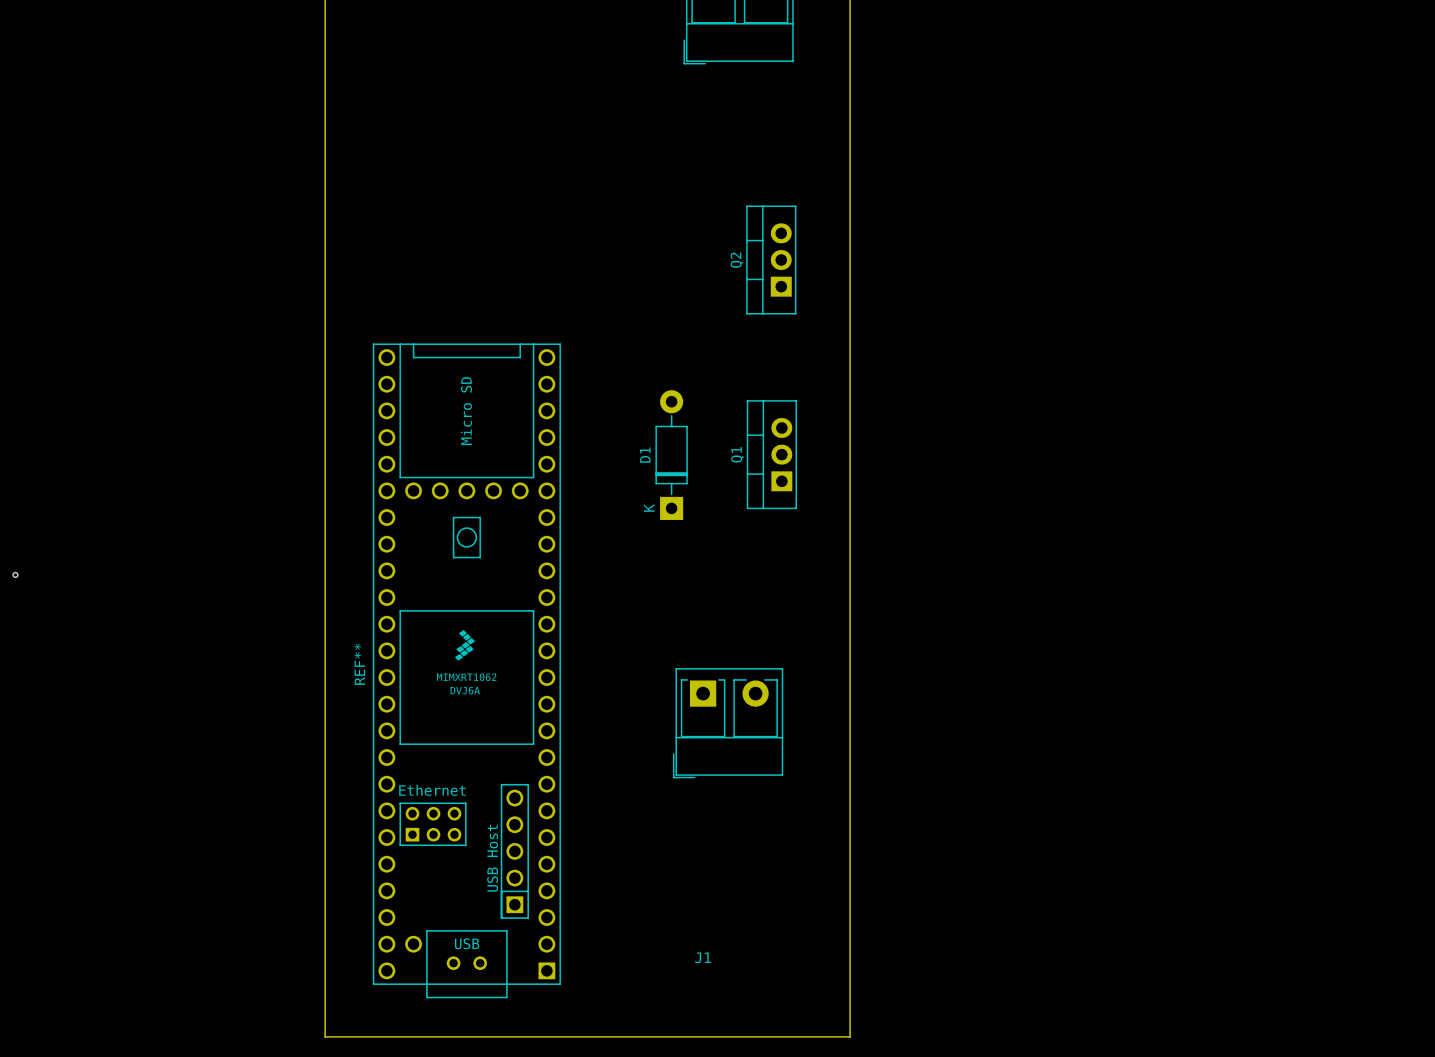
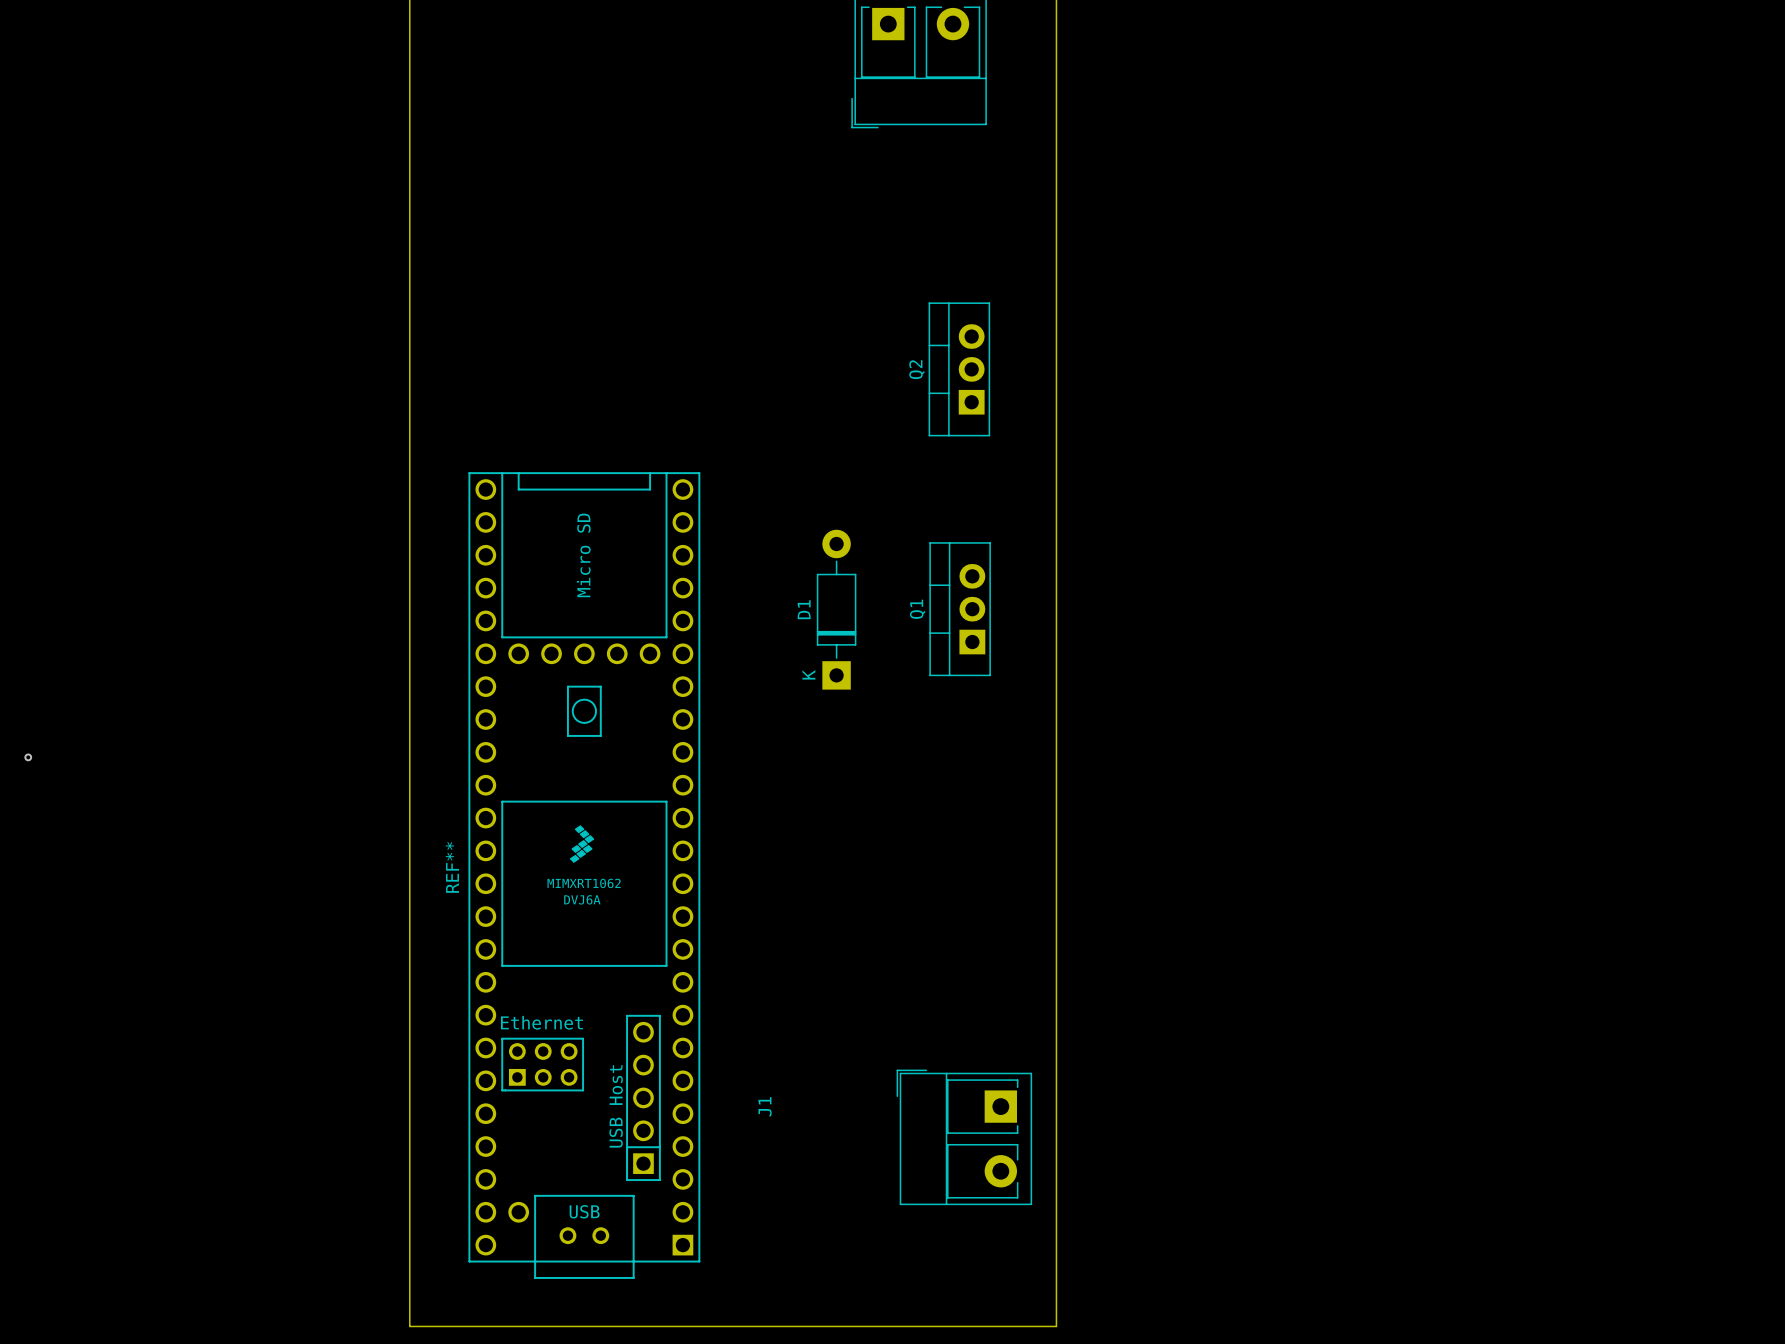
J1 rotation: 0° (728, 723) -> 90° clockwise (964, 1137)
J1 position: (728, 723) -> (964, 1137)
J1 name position: J1 (703, 957) -> J1 (765, 1106)

